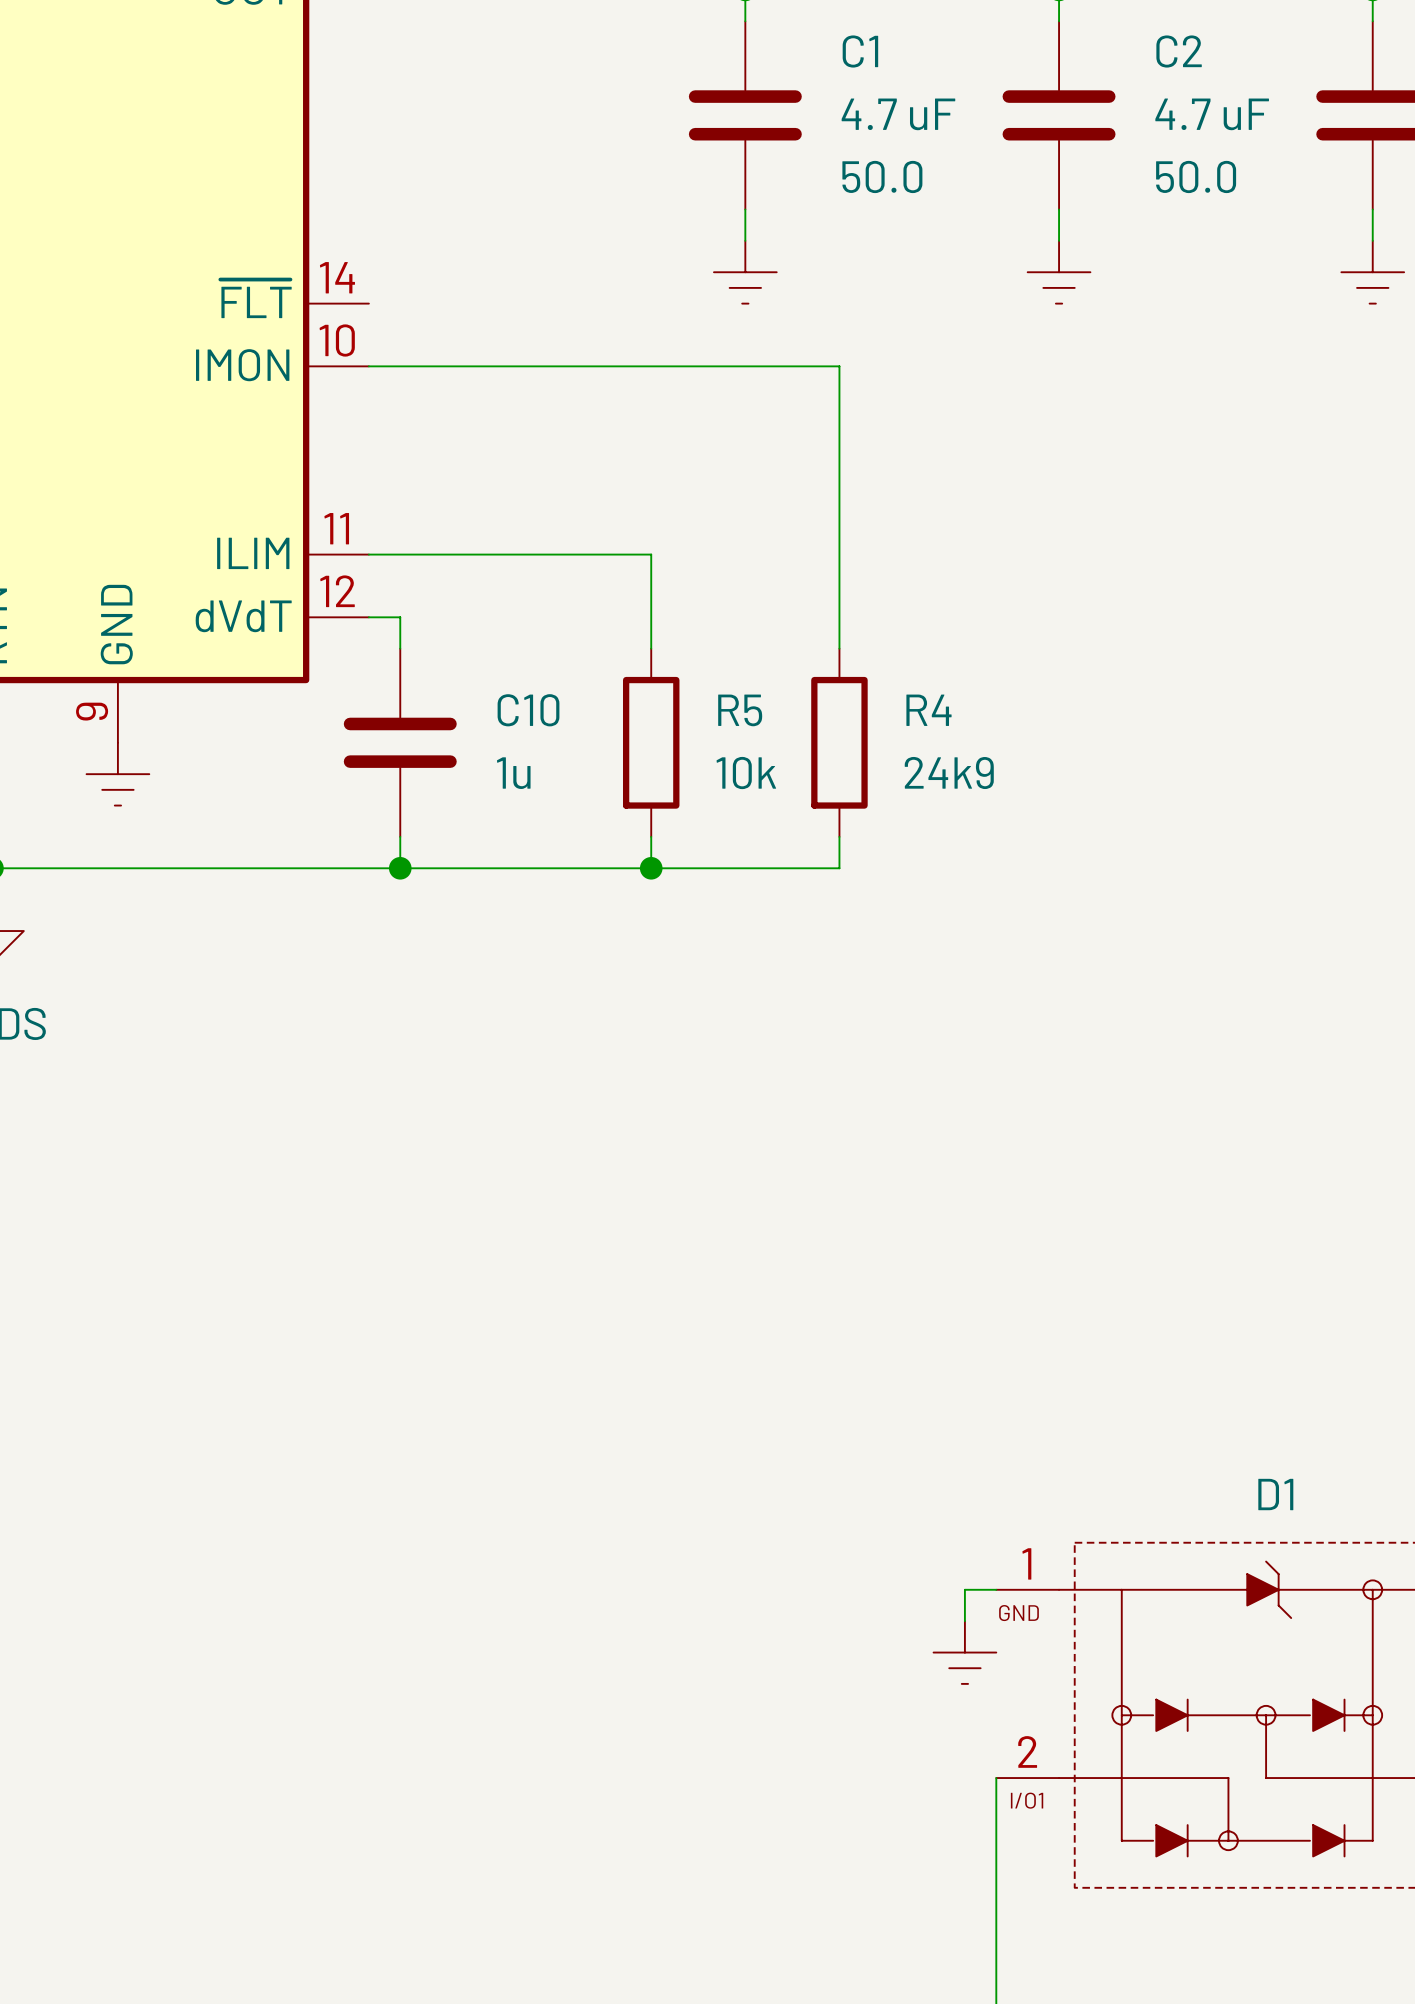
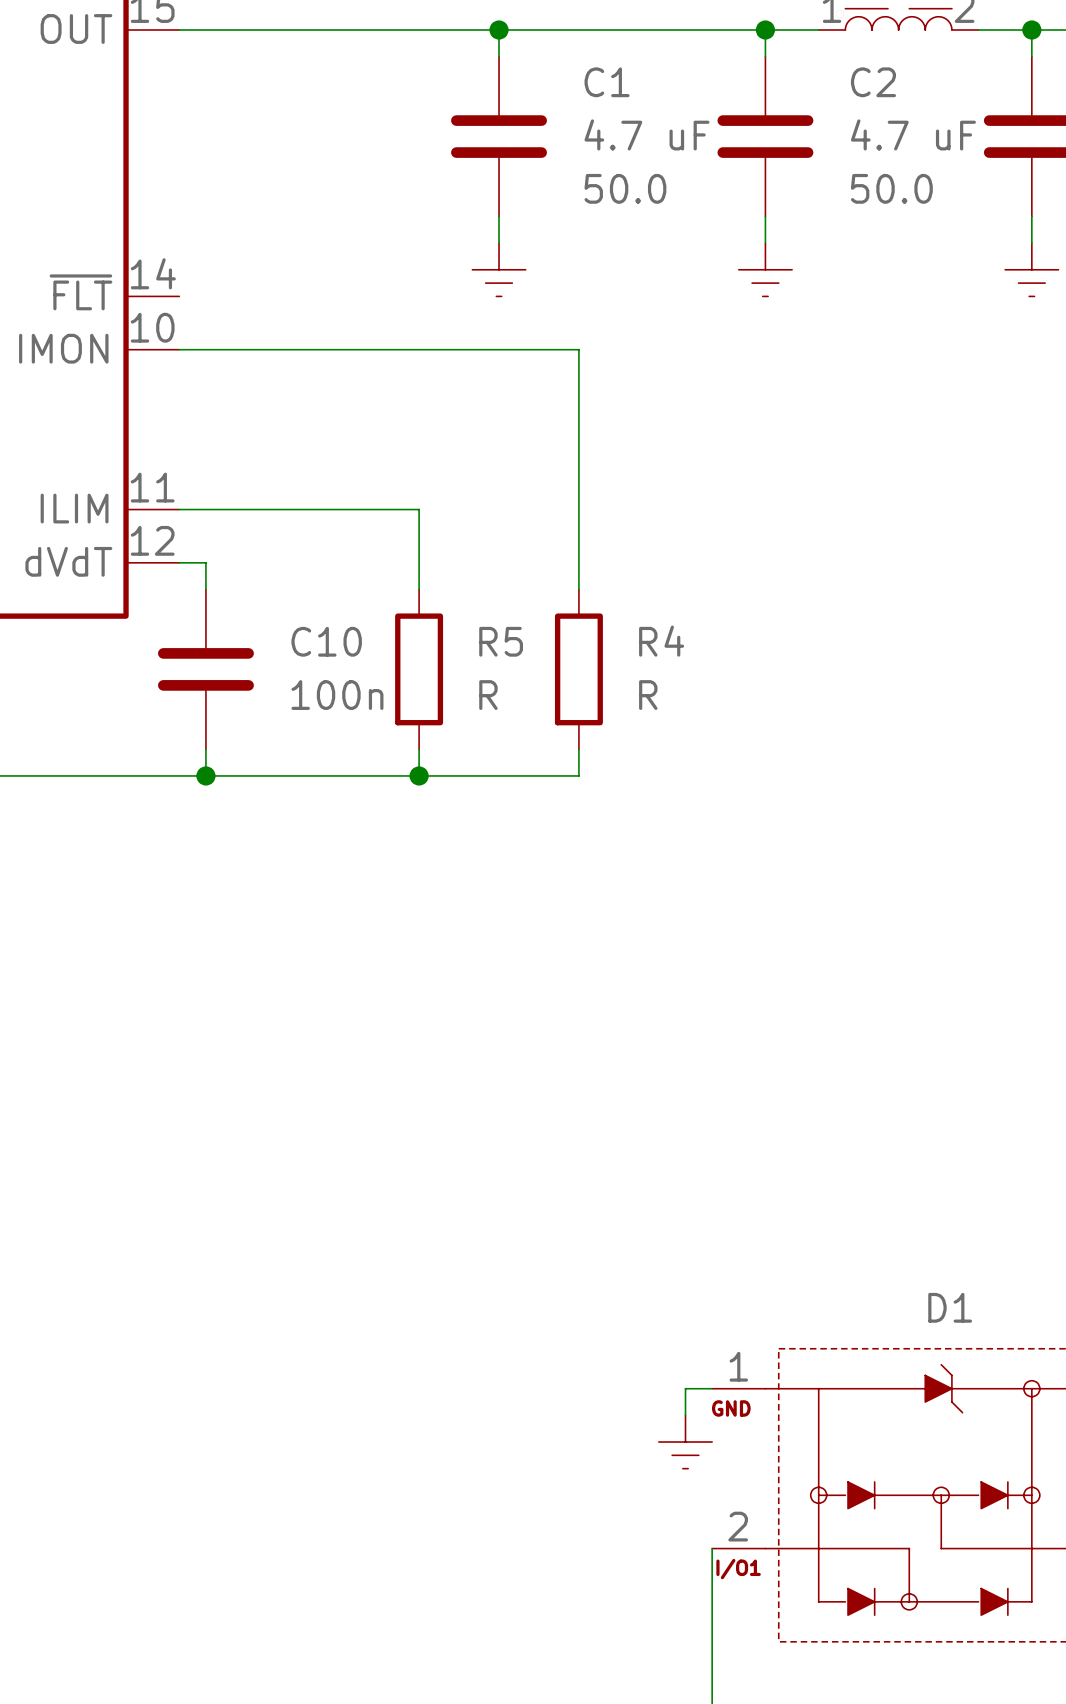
R4 value: 24k9 (949, 772) -> R (648, 695)
C10 value: 1u (513, 773) -> 100n (337, 695)
R5 value: 10k (746, 773) -> R (488, 695)

